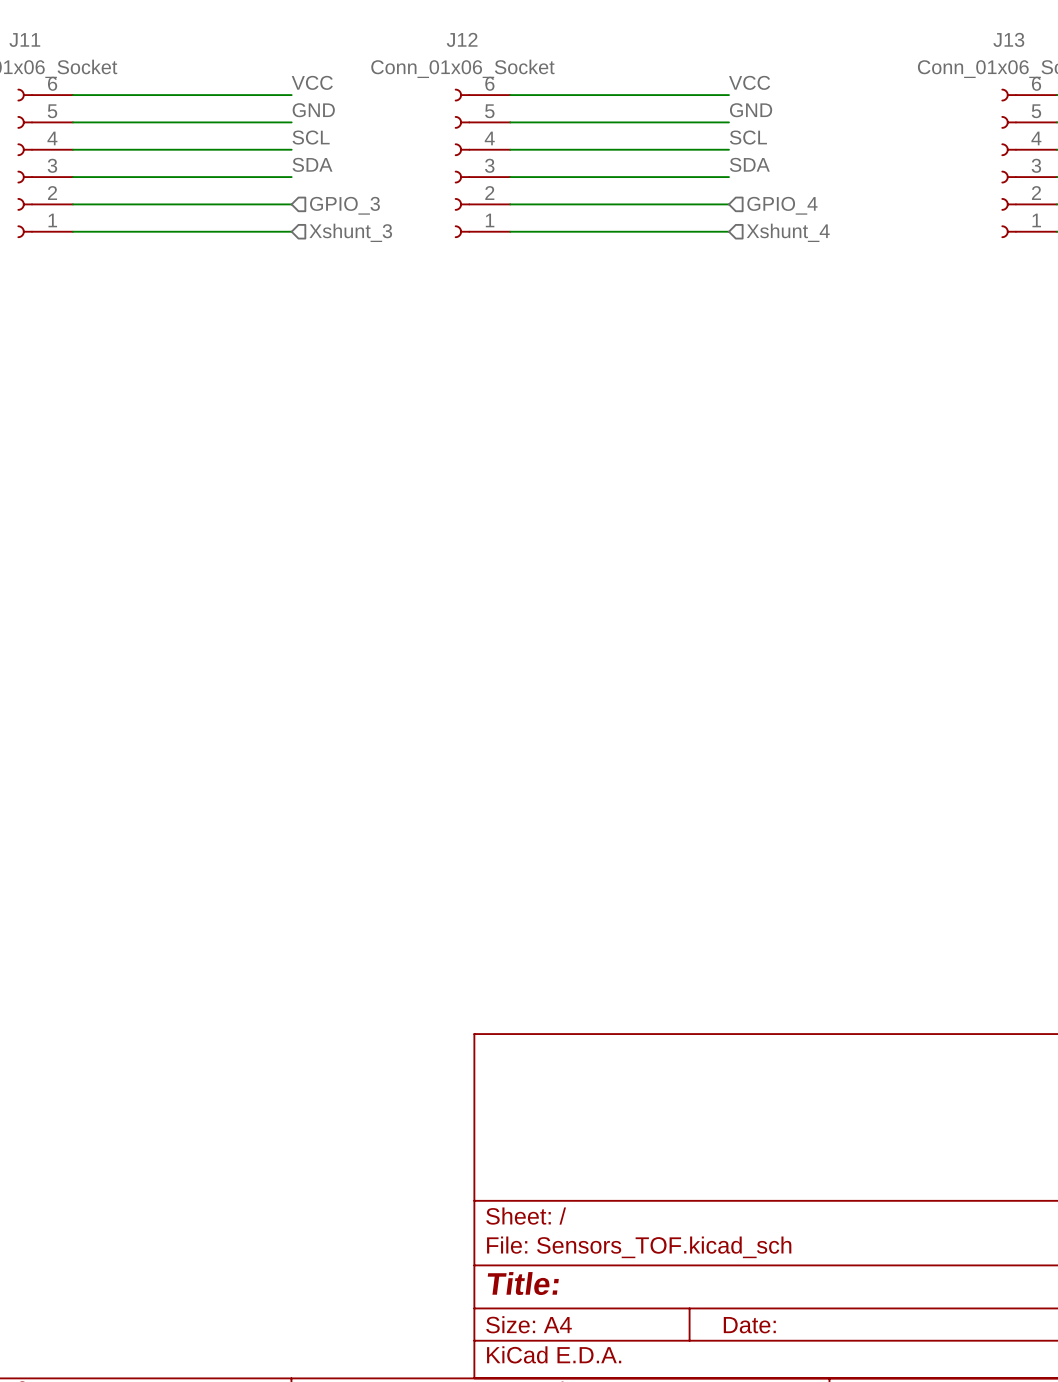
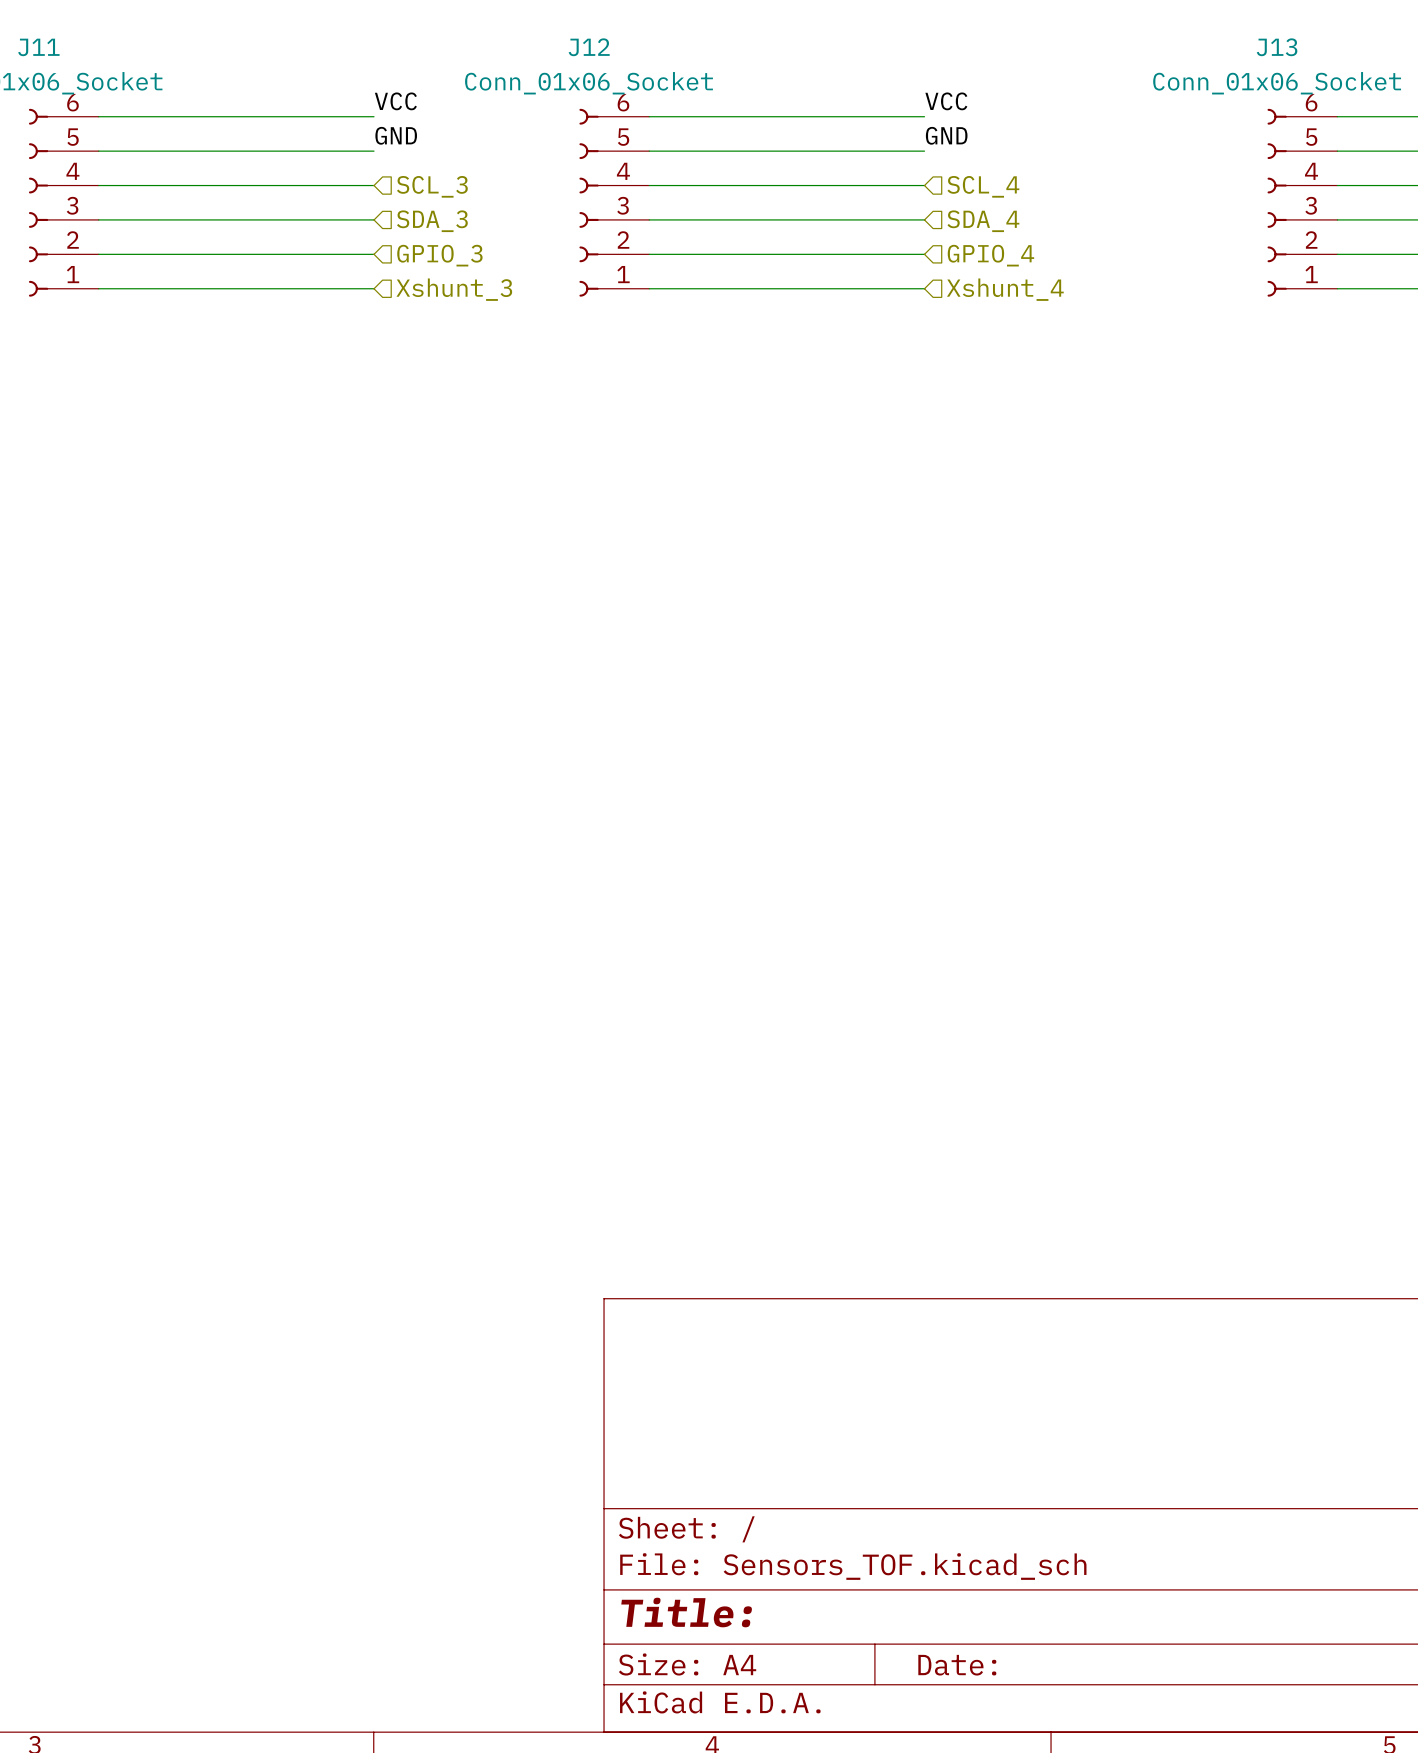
label: SCL (311, 137) -> none
label: SCL (748, 137) -> none
hierarchical label: none -> SCL_3 (432, 186)
hierarchical label: none -> SCL_4 (983, 186)
label: SDA (312, 164) -> none
label: SDA (749, 164) -> none
hierarchical label: none -> SDA_3 (432, 221)
hierarchical label: none -> SDA_4 (983, 221)

